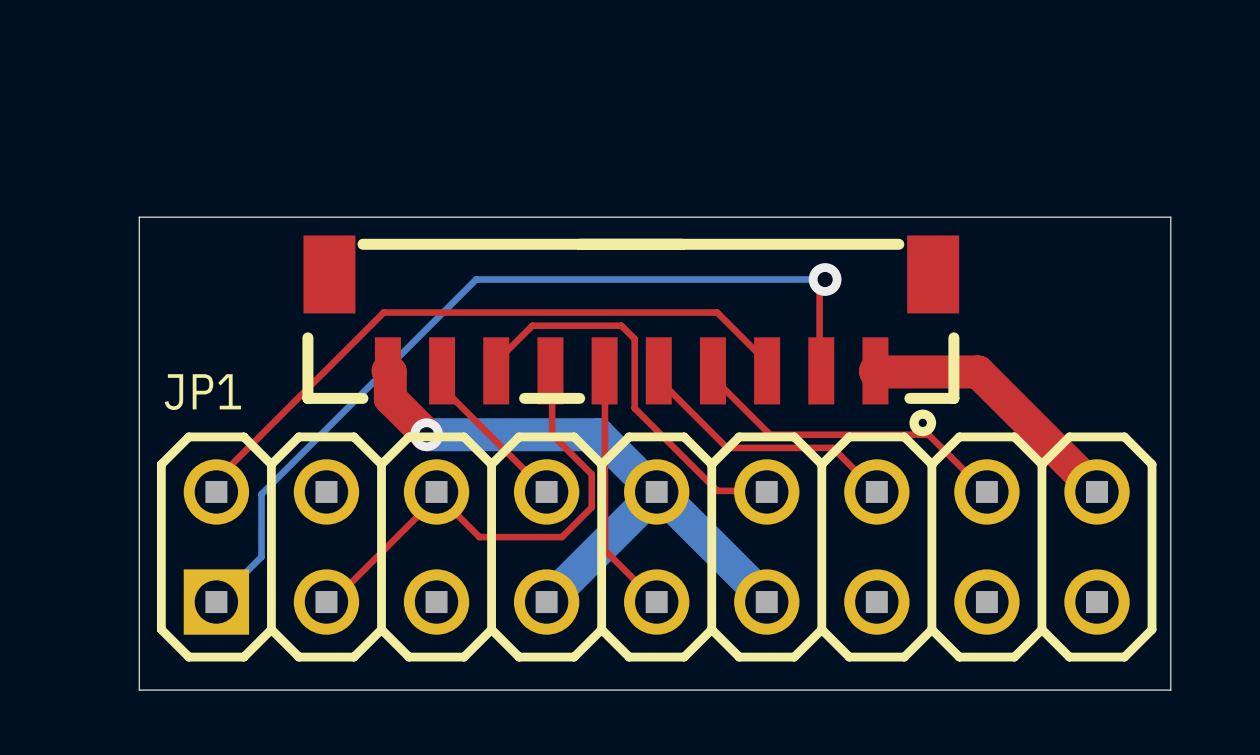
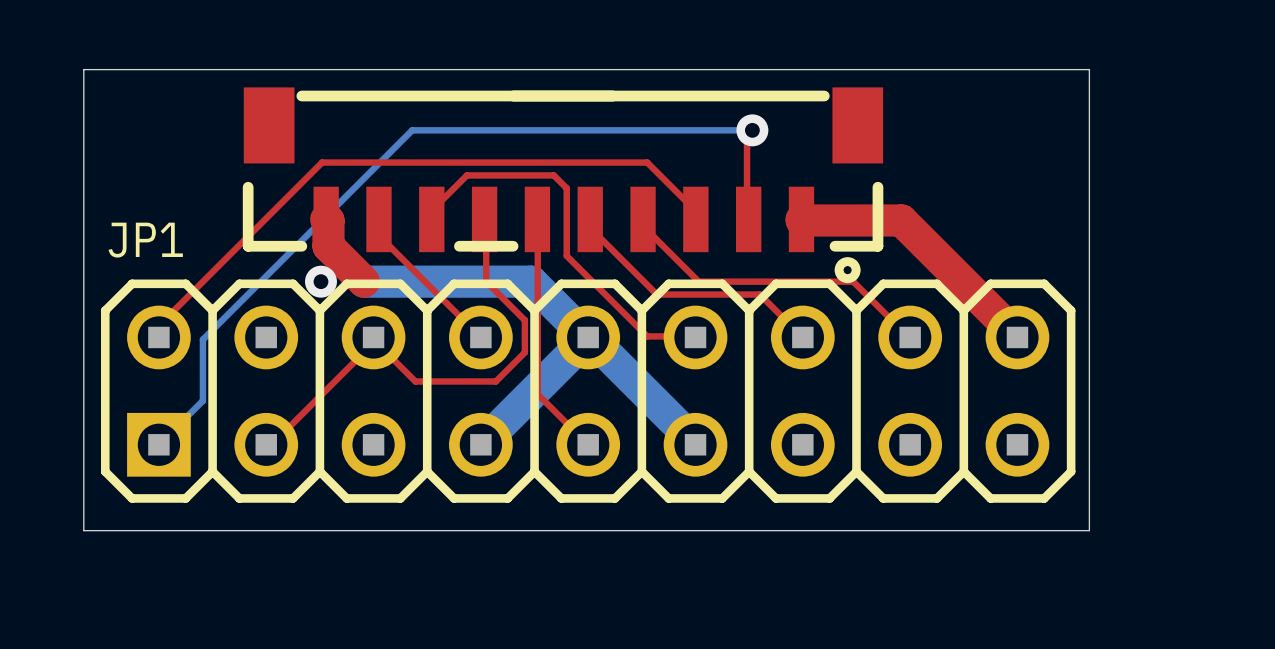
via position: (426, 434) -> (320, 281)

